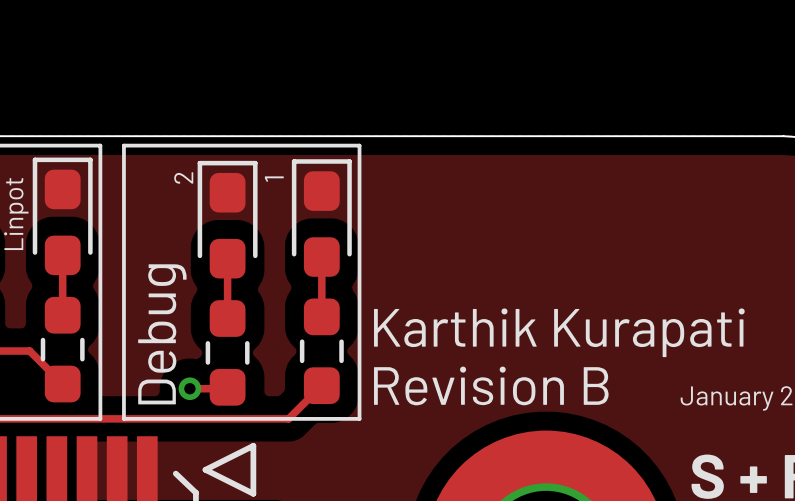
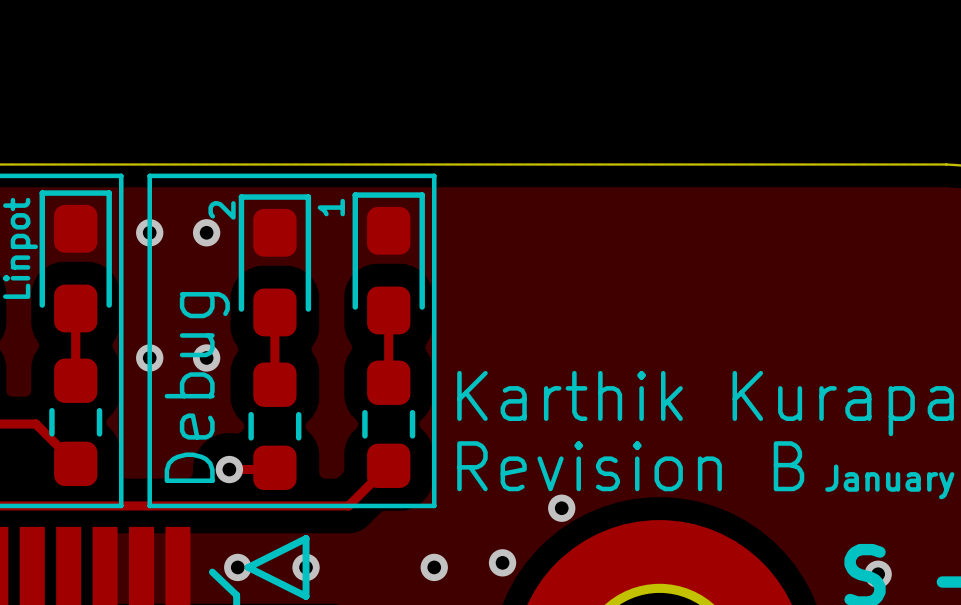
via: none -> (149, 232)
via: none -> (206, 232)
via: none -> (149, 357)
via: none -> (206, 357)
via: none -> (561, 508)
via: none -> (502, 562)
via: none -> (237, 567)
via: none -> (306, 567)
via: none -> (434, 567)
via: none -> (878, 574)

